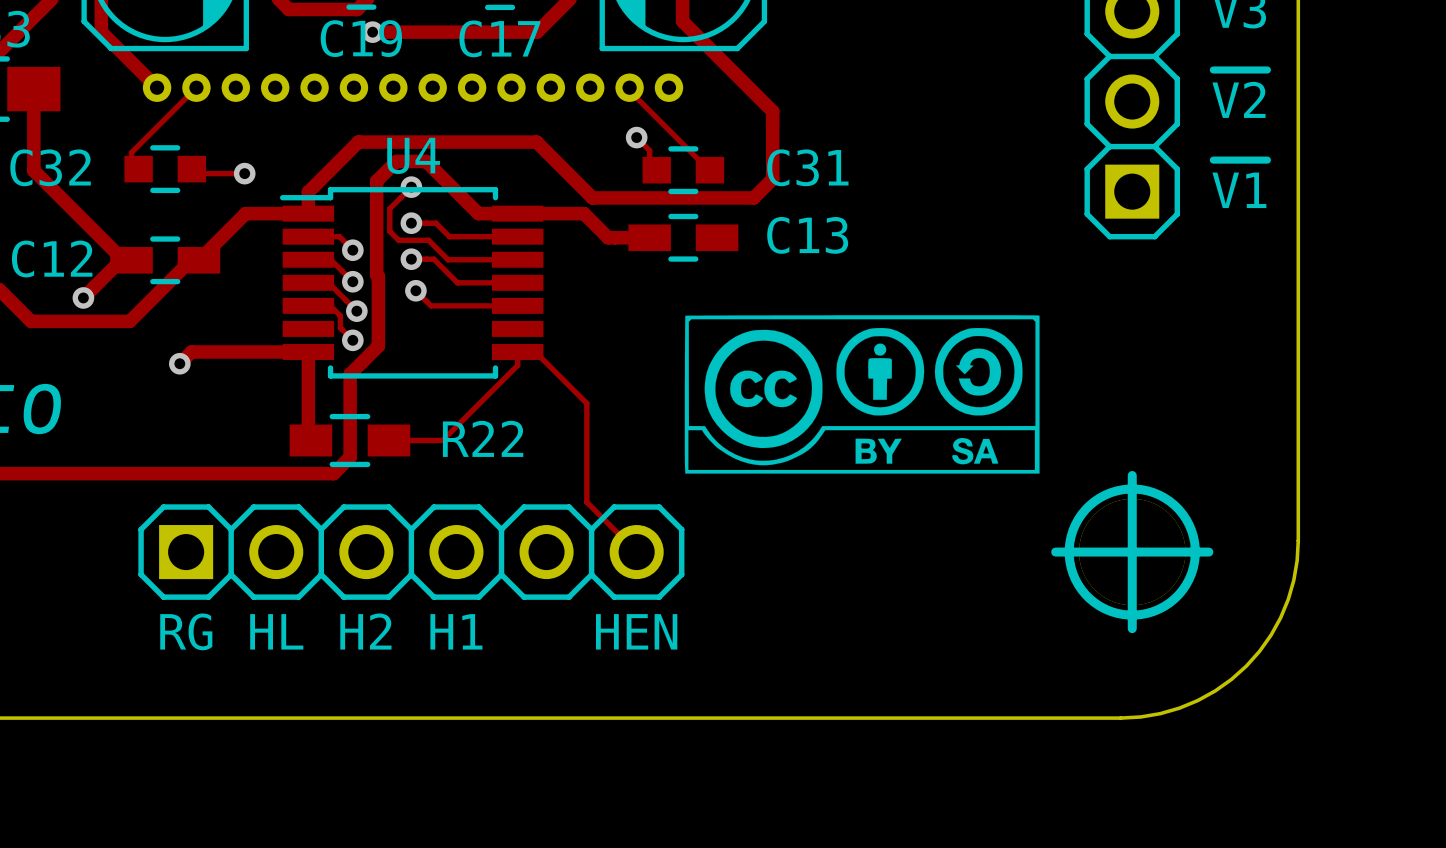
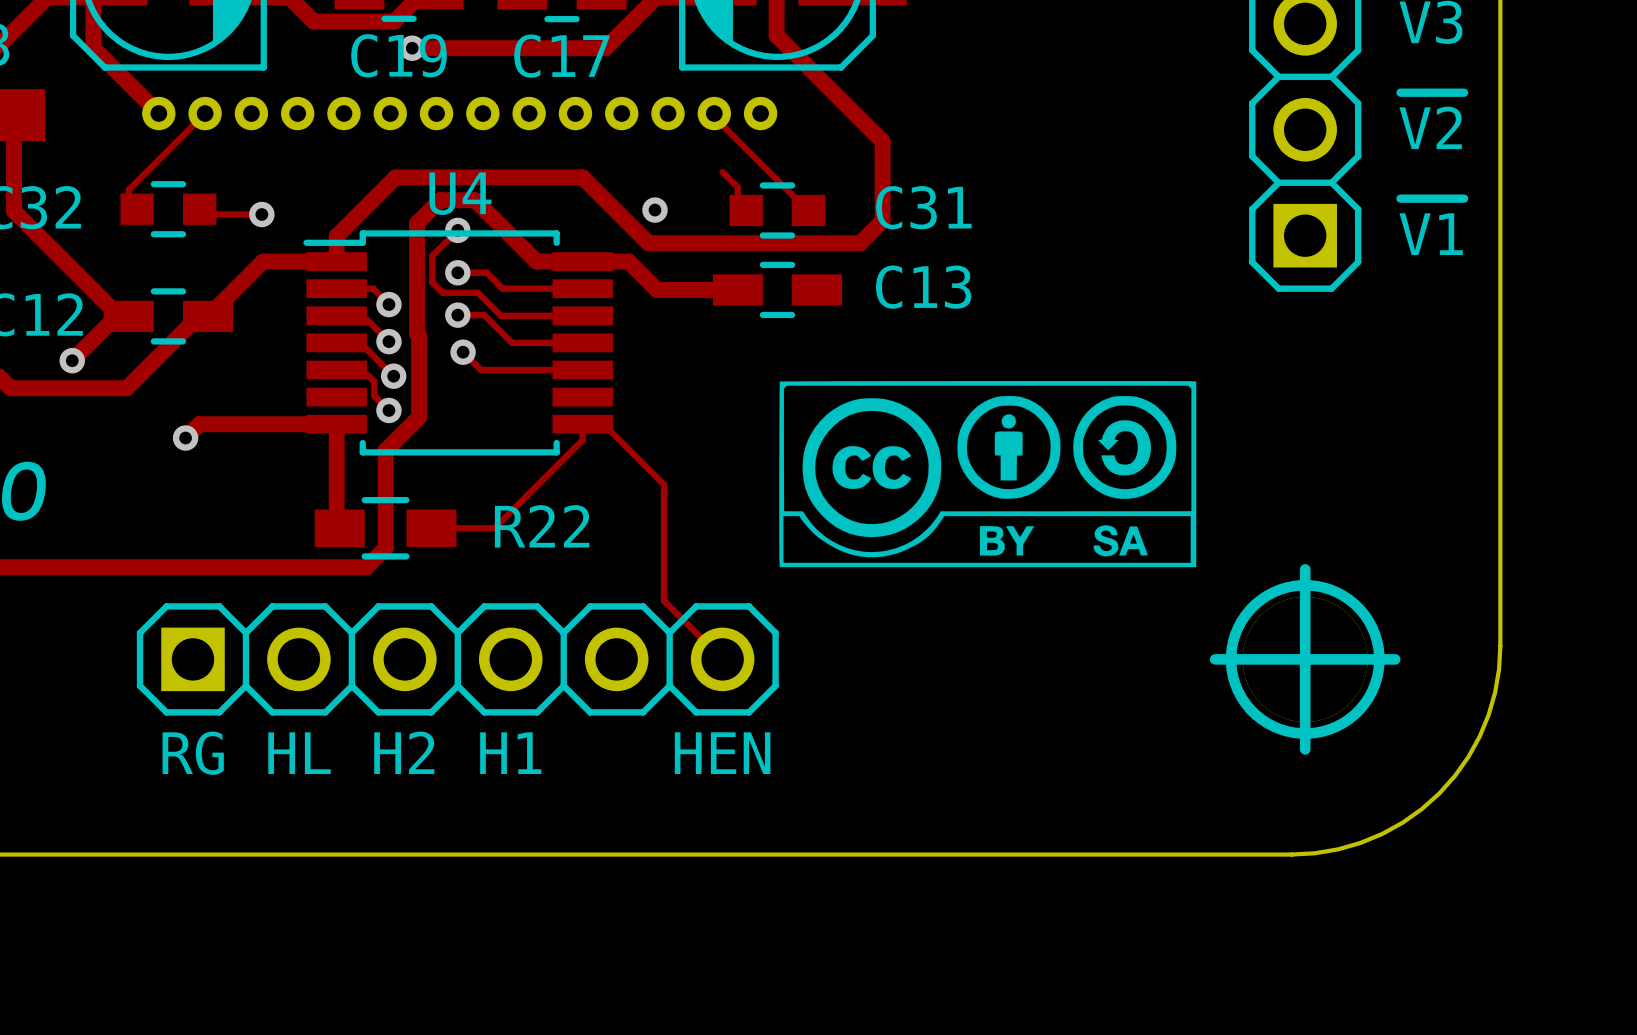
via position: (636, 137) -> (655, 210)
track: (517, 142) (536, 142) (592, 197) -> (582, 177) (648, 243) (670, 243)
track: (556, 213) (584, 213) (608, 237) -> (628, 261) (656, 289) (689, 289)

